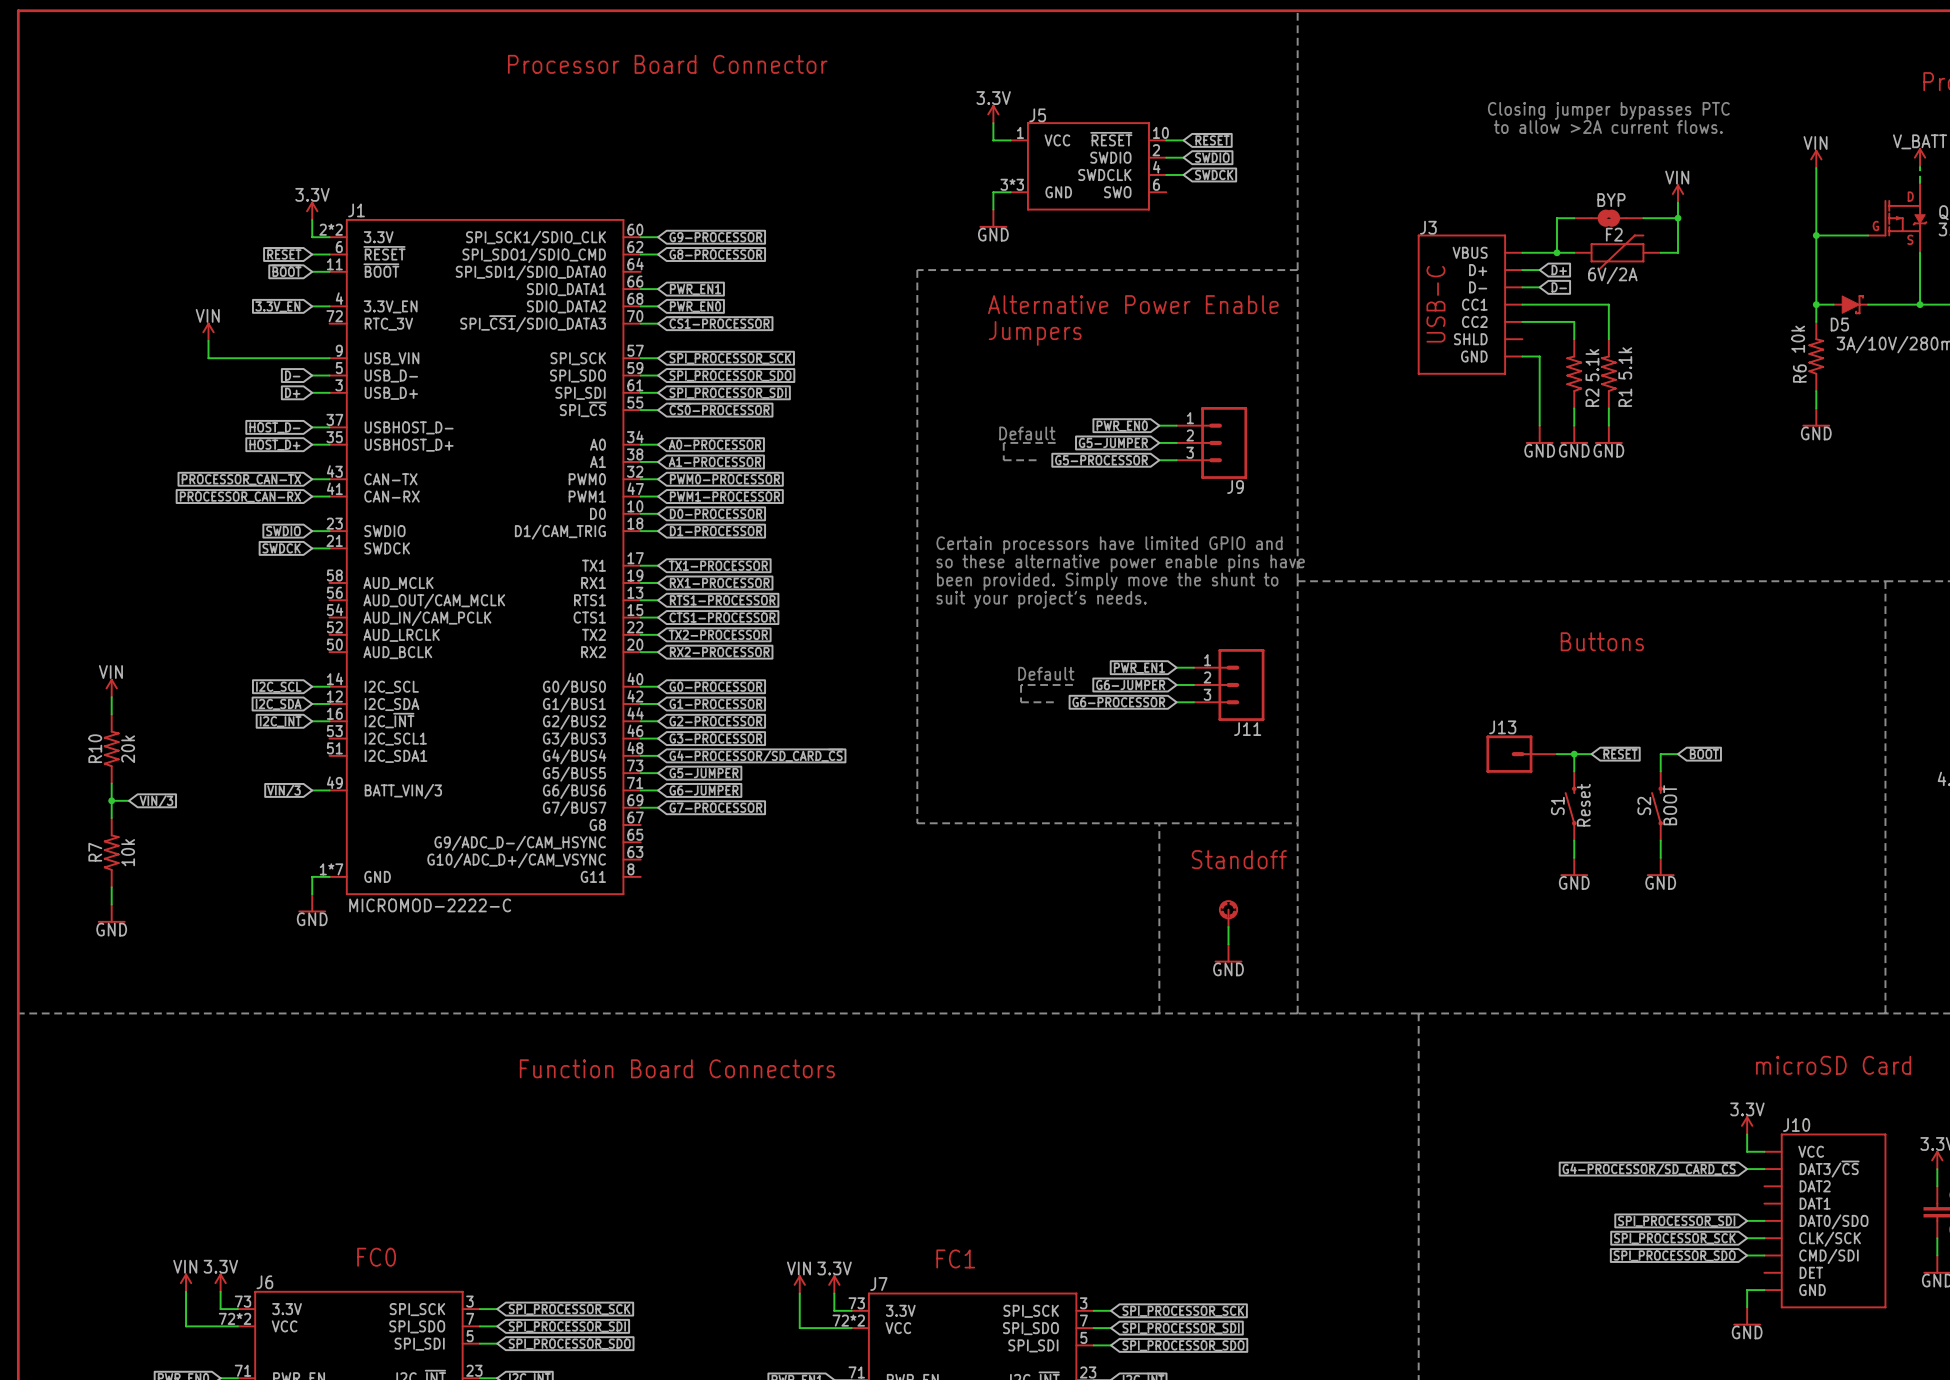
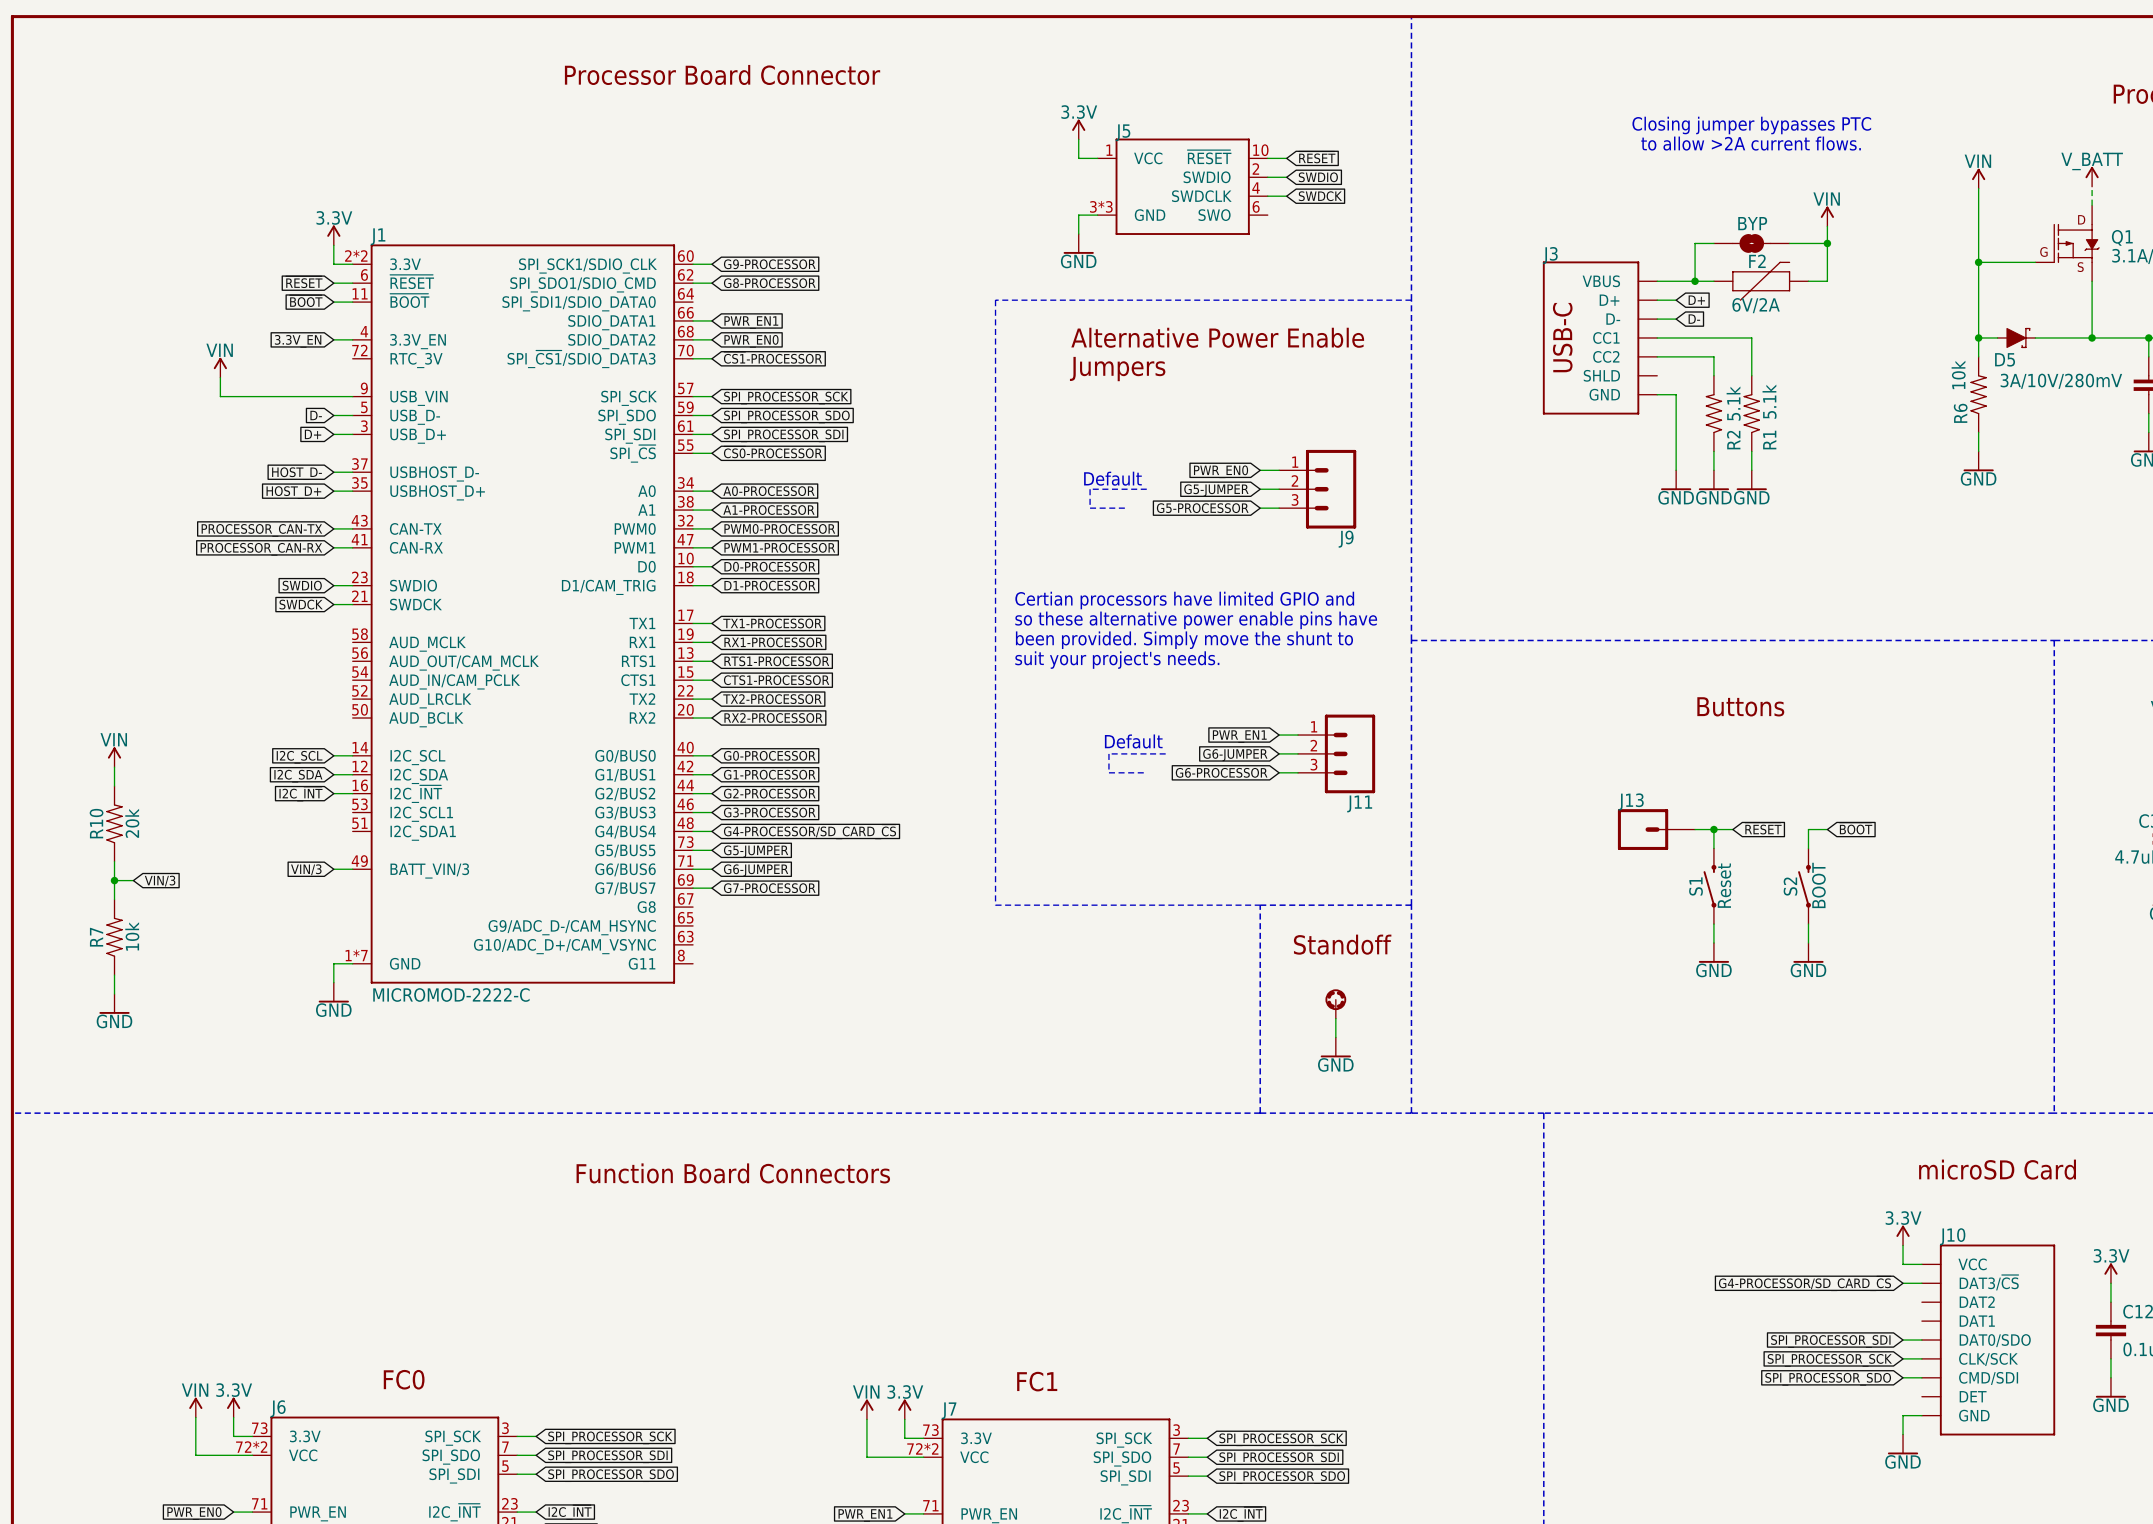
text: Certain processors have limited GPIO and (1109, 545) -> Certian processors have limited GPIO and (1184, 600)

